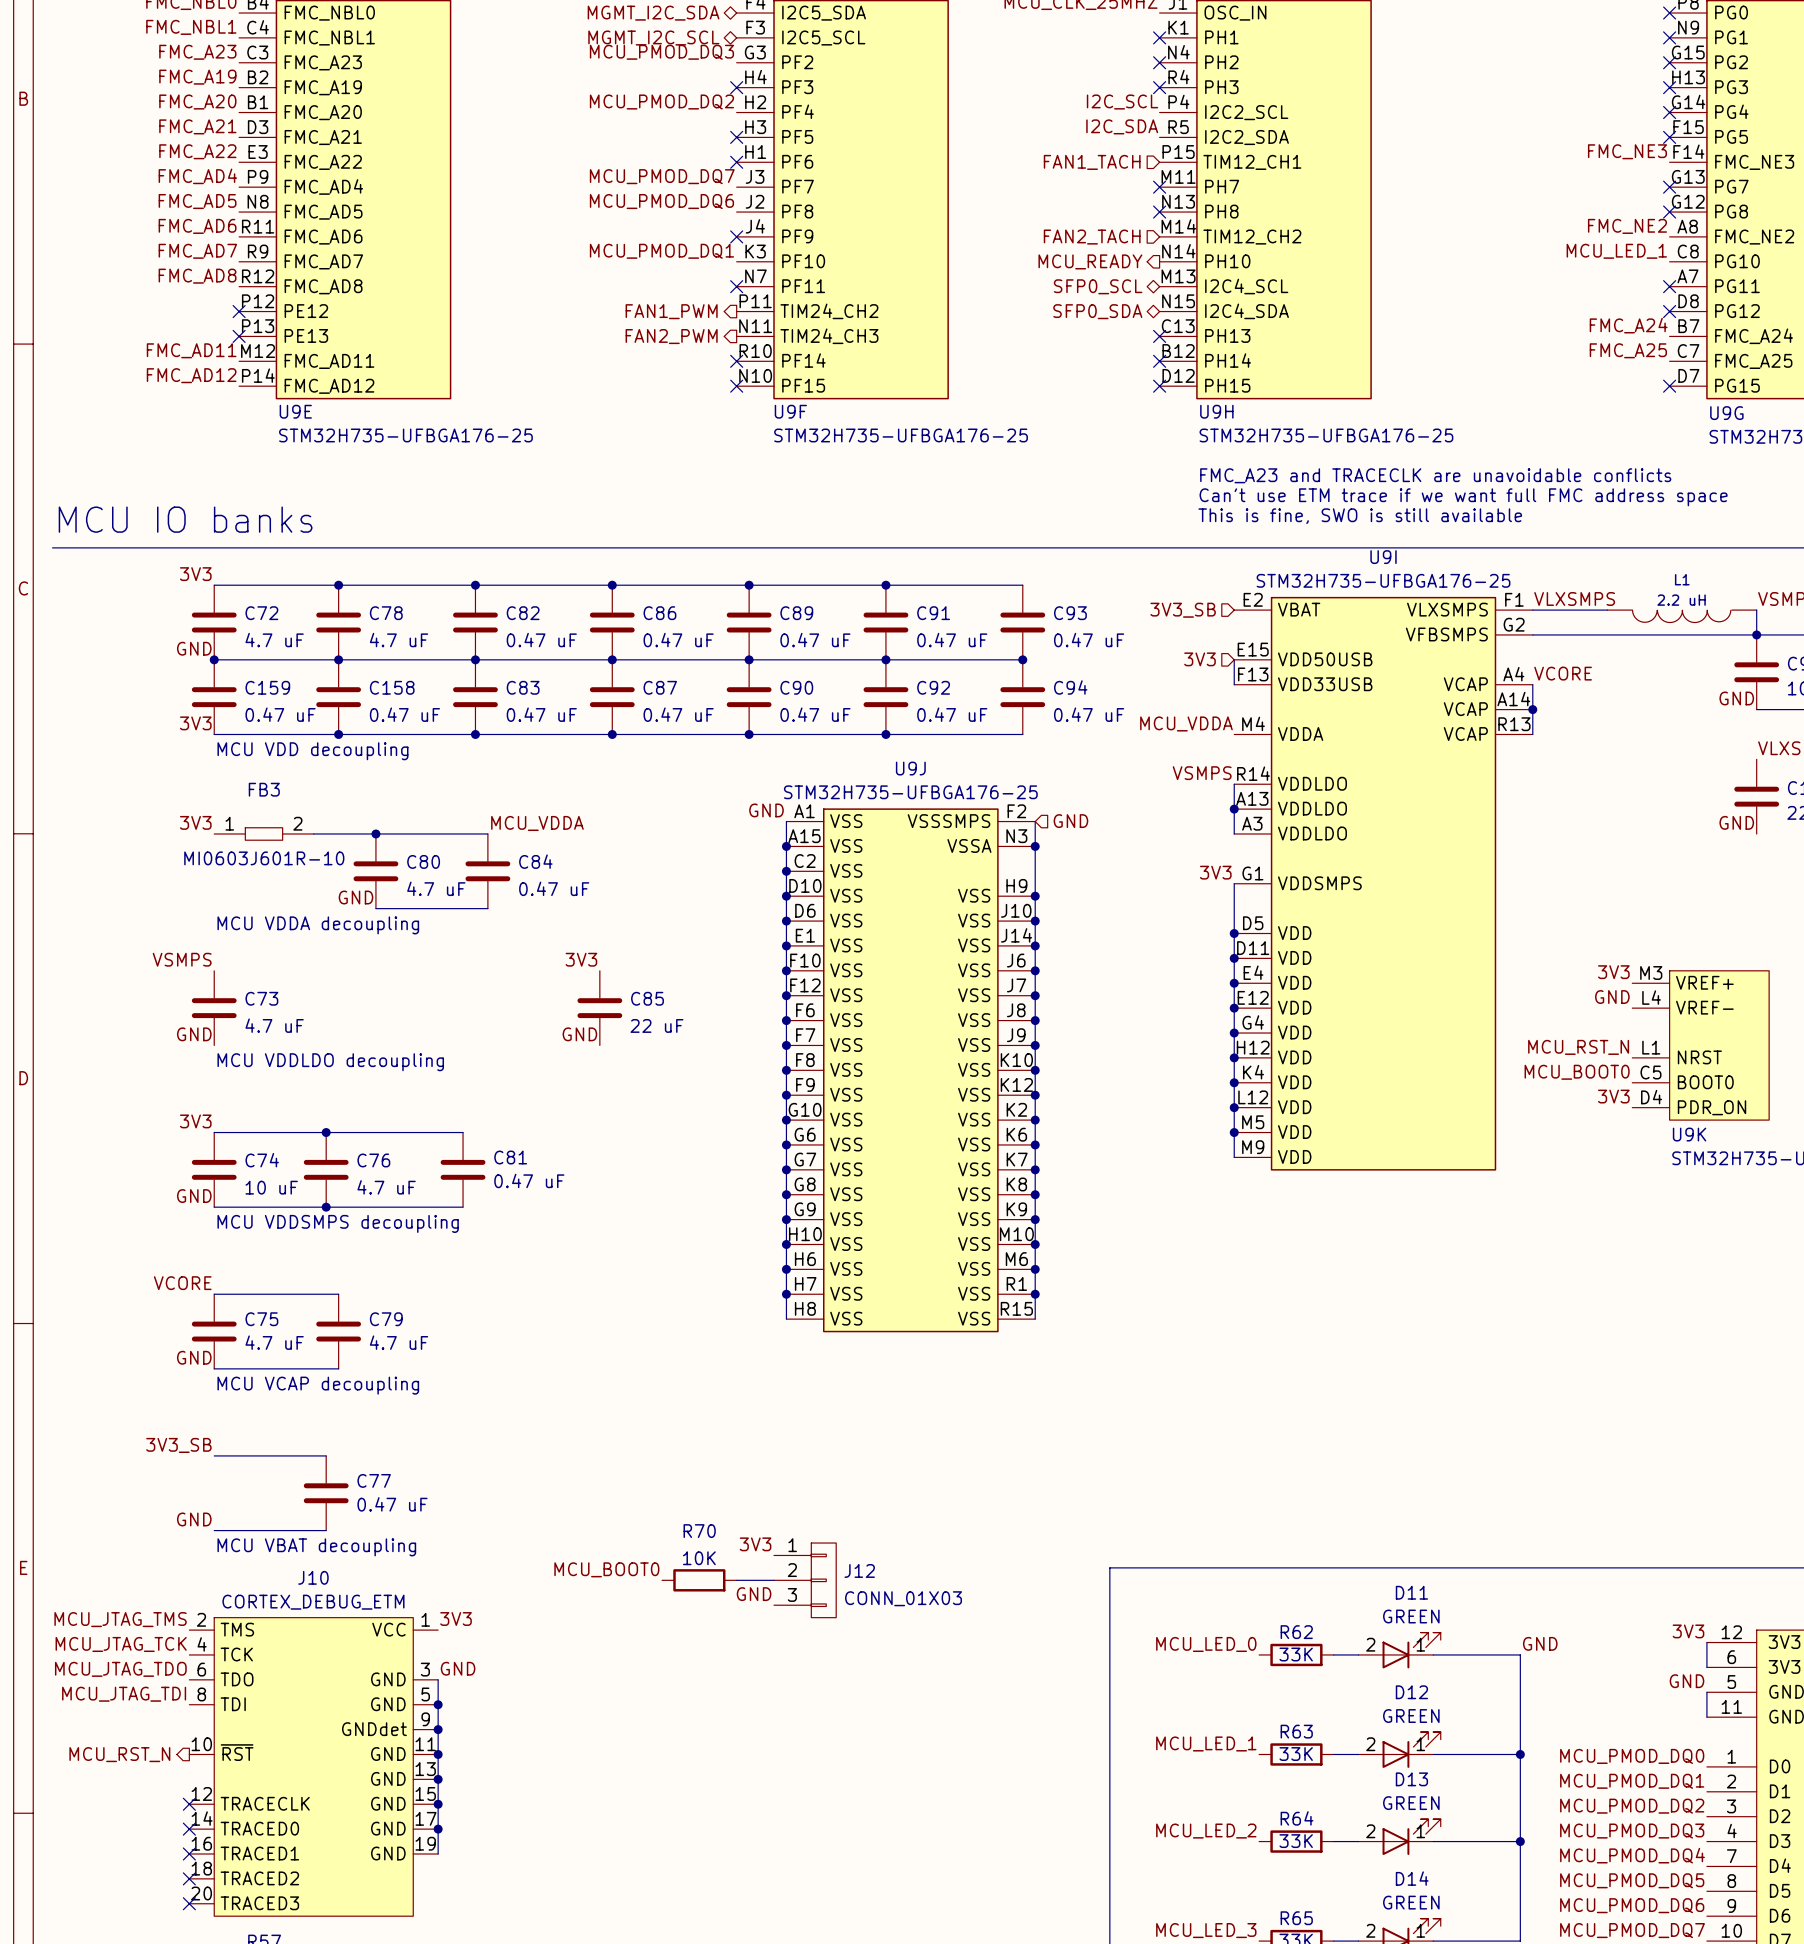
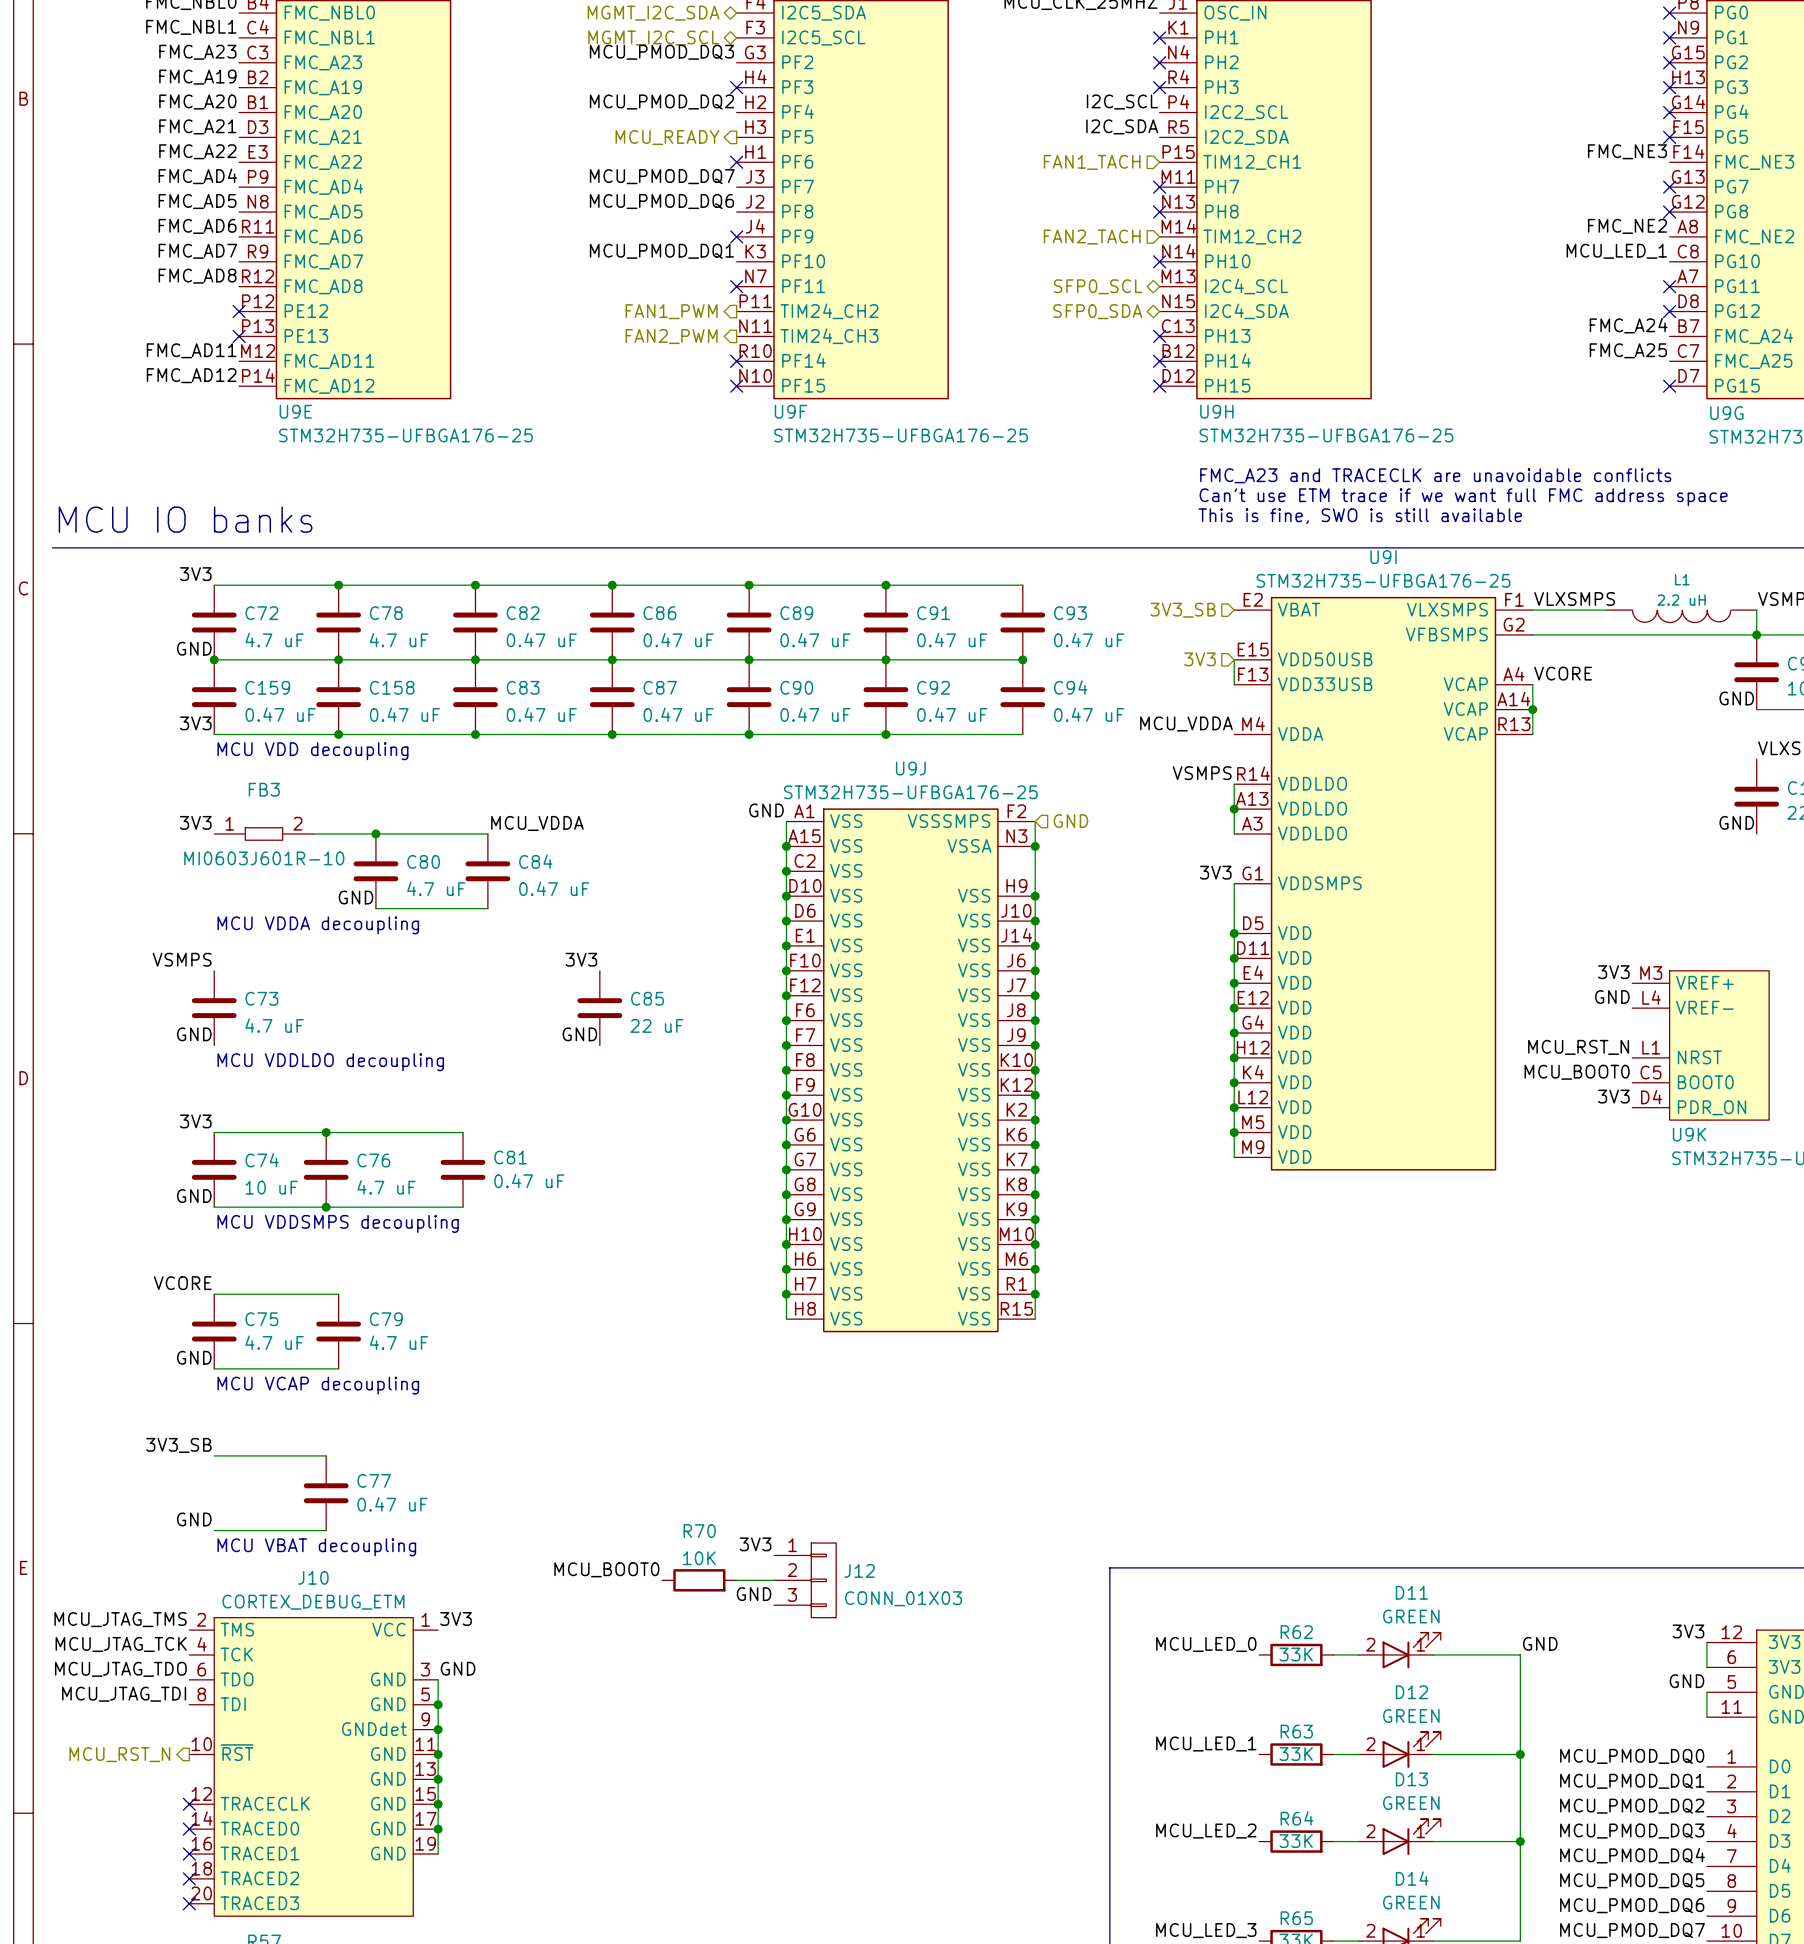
hierarchical label: none -> MCU_READY (667, 137)
no-connect mark: (736, 137) -> none
hierarchical label: MCU_READY (1090, 261) -> none
no-connect mark: none -> (1159, 261)

